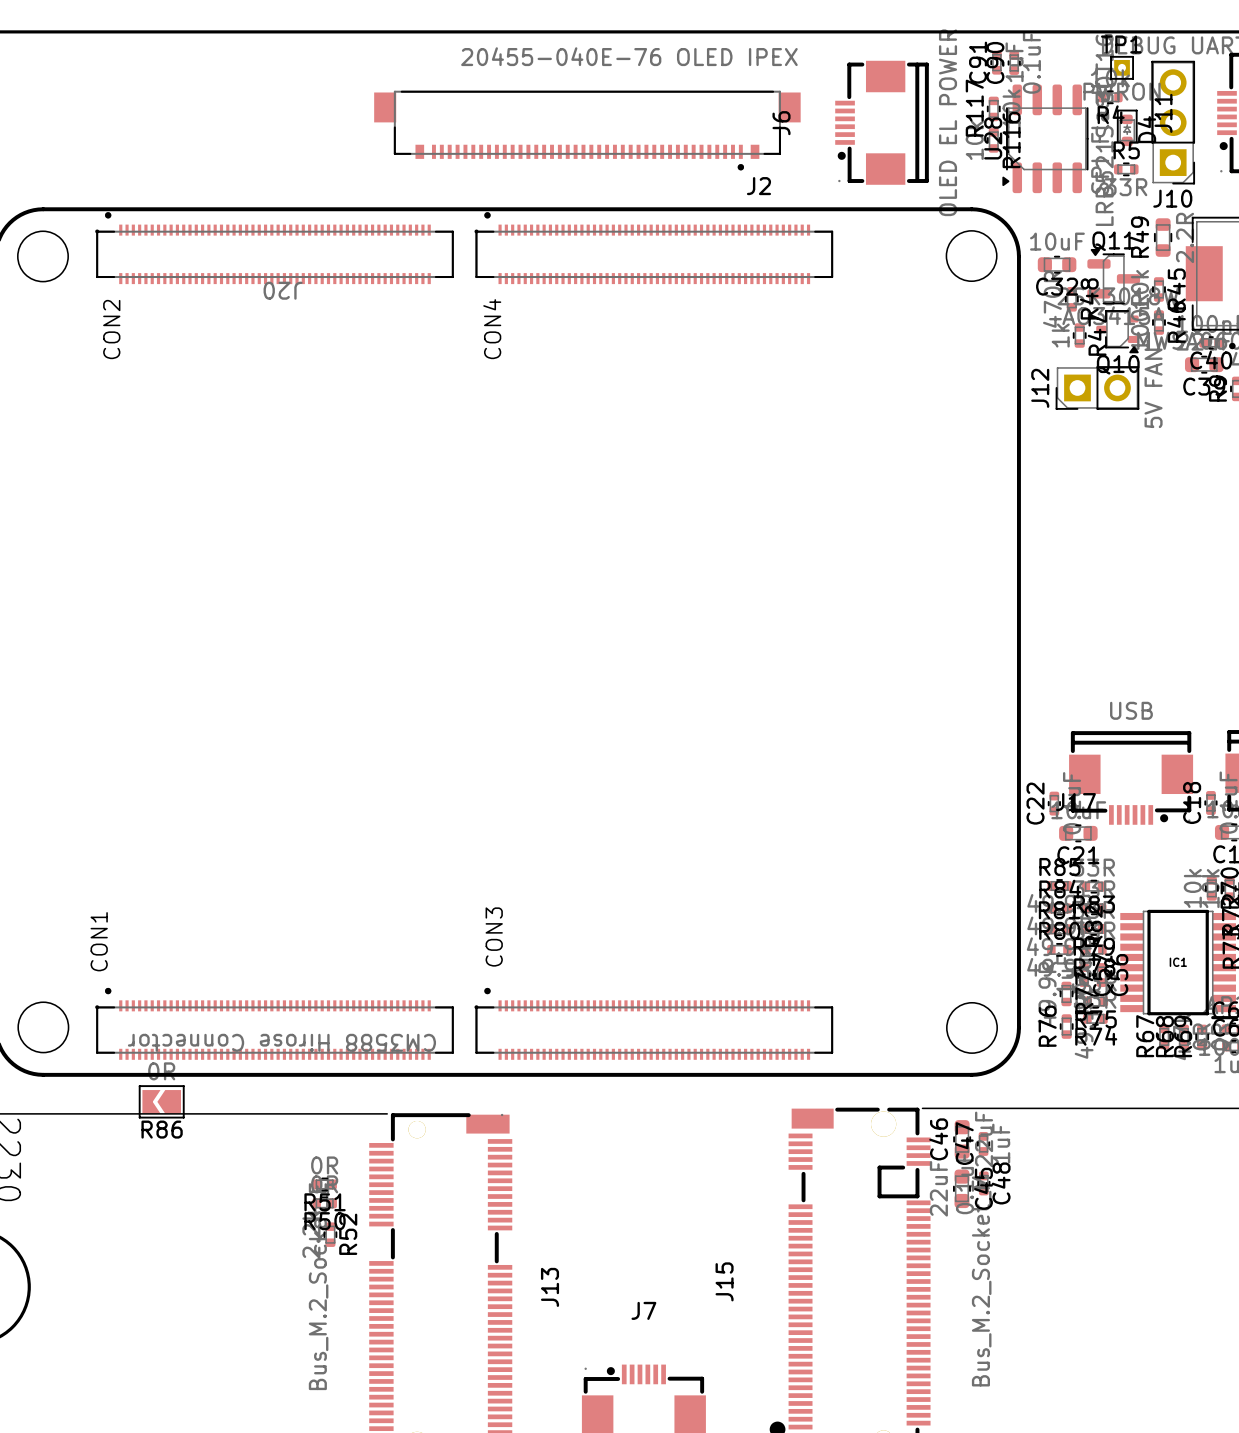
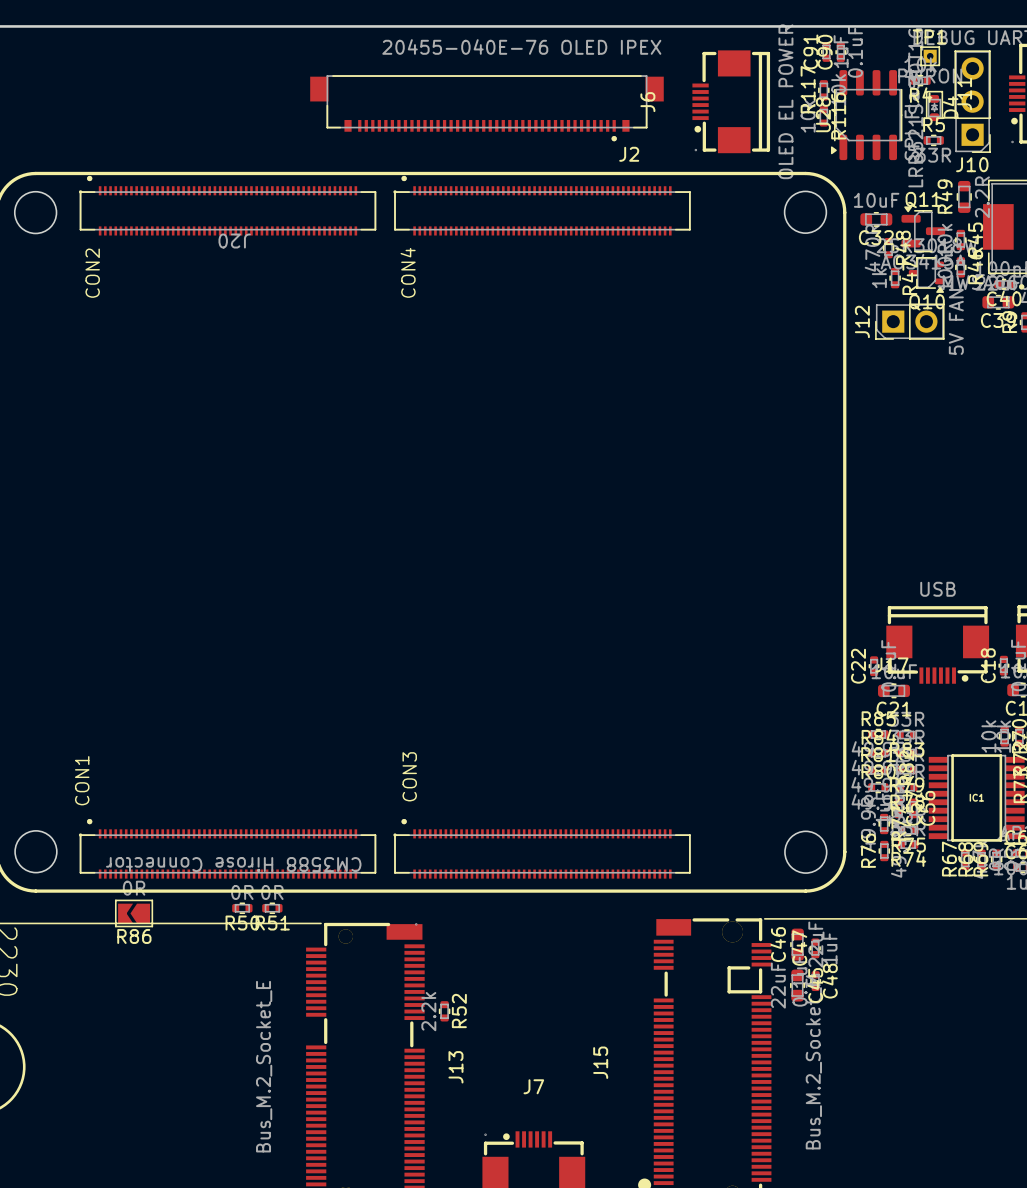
R51 position: (324, 1184) -> (272, 908)
R50 position: (324, 1203) -> (242, 908)
R52 position: (330, 1234) -> (444, 1011)

